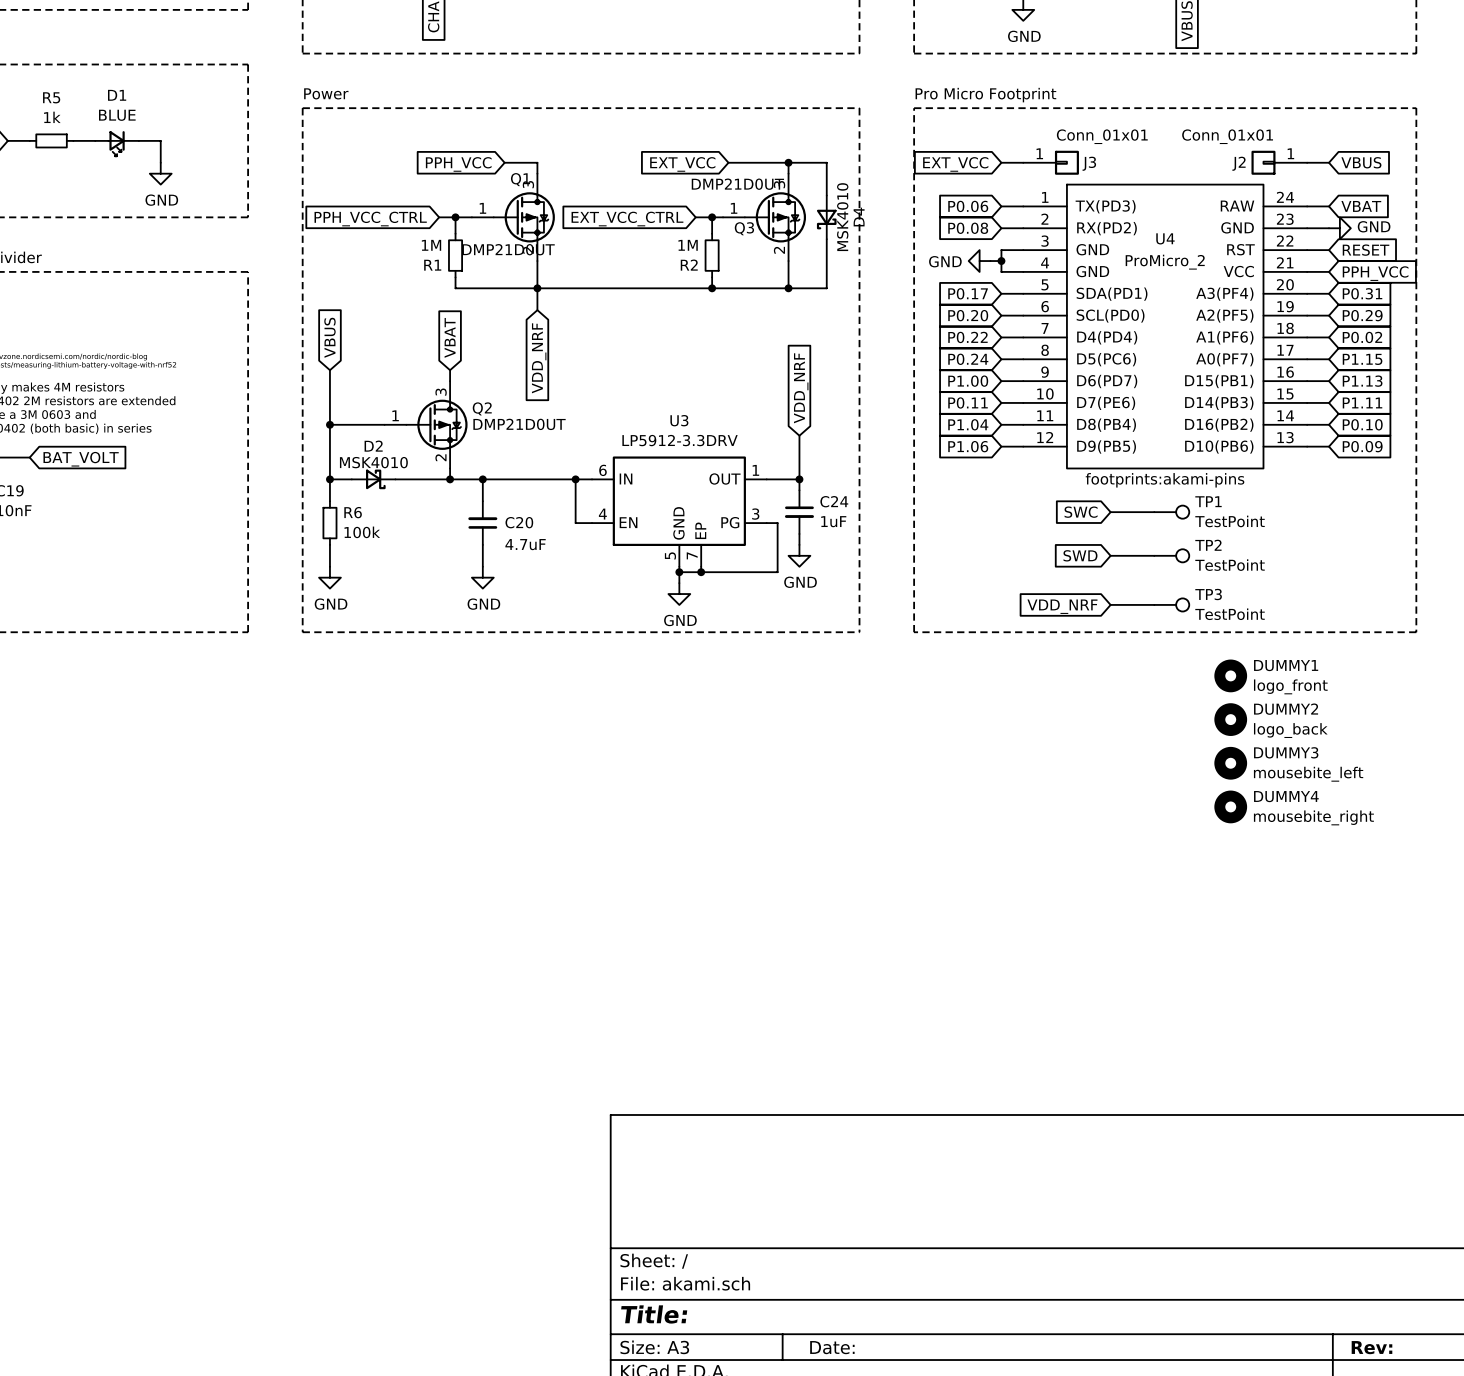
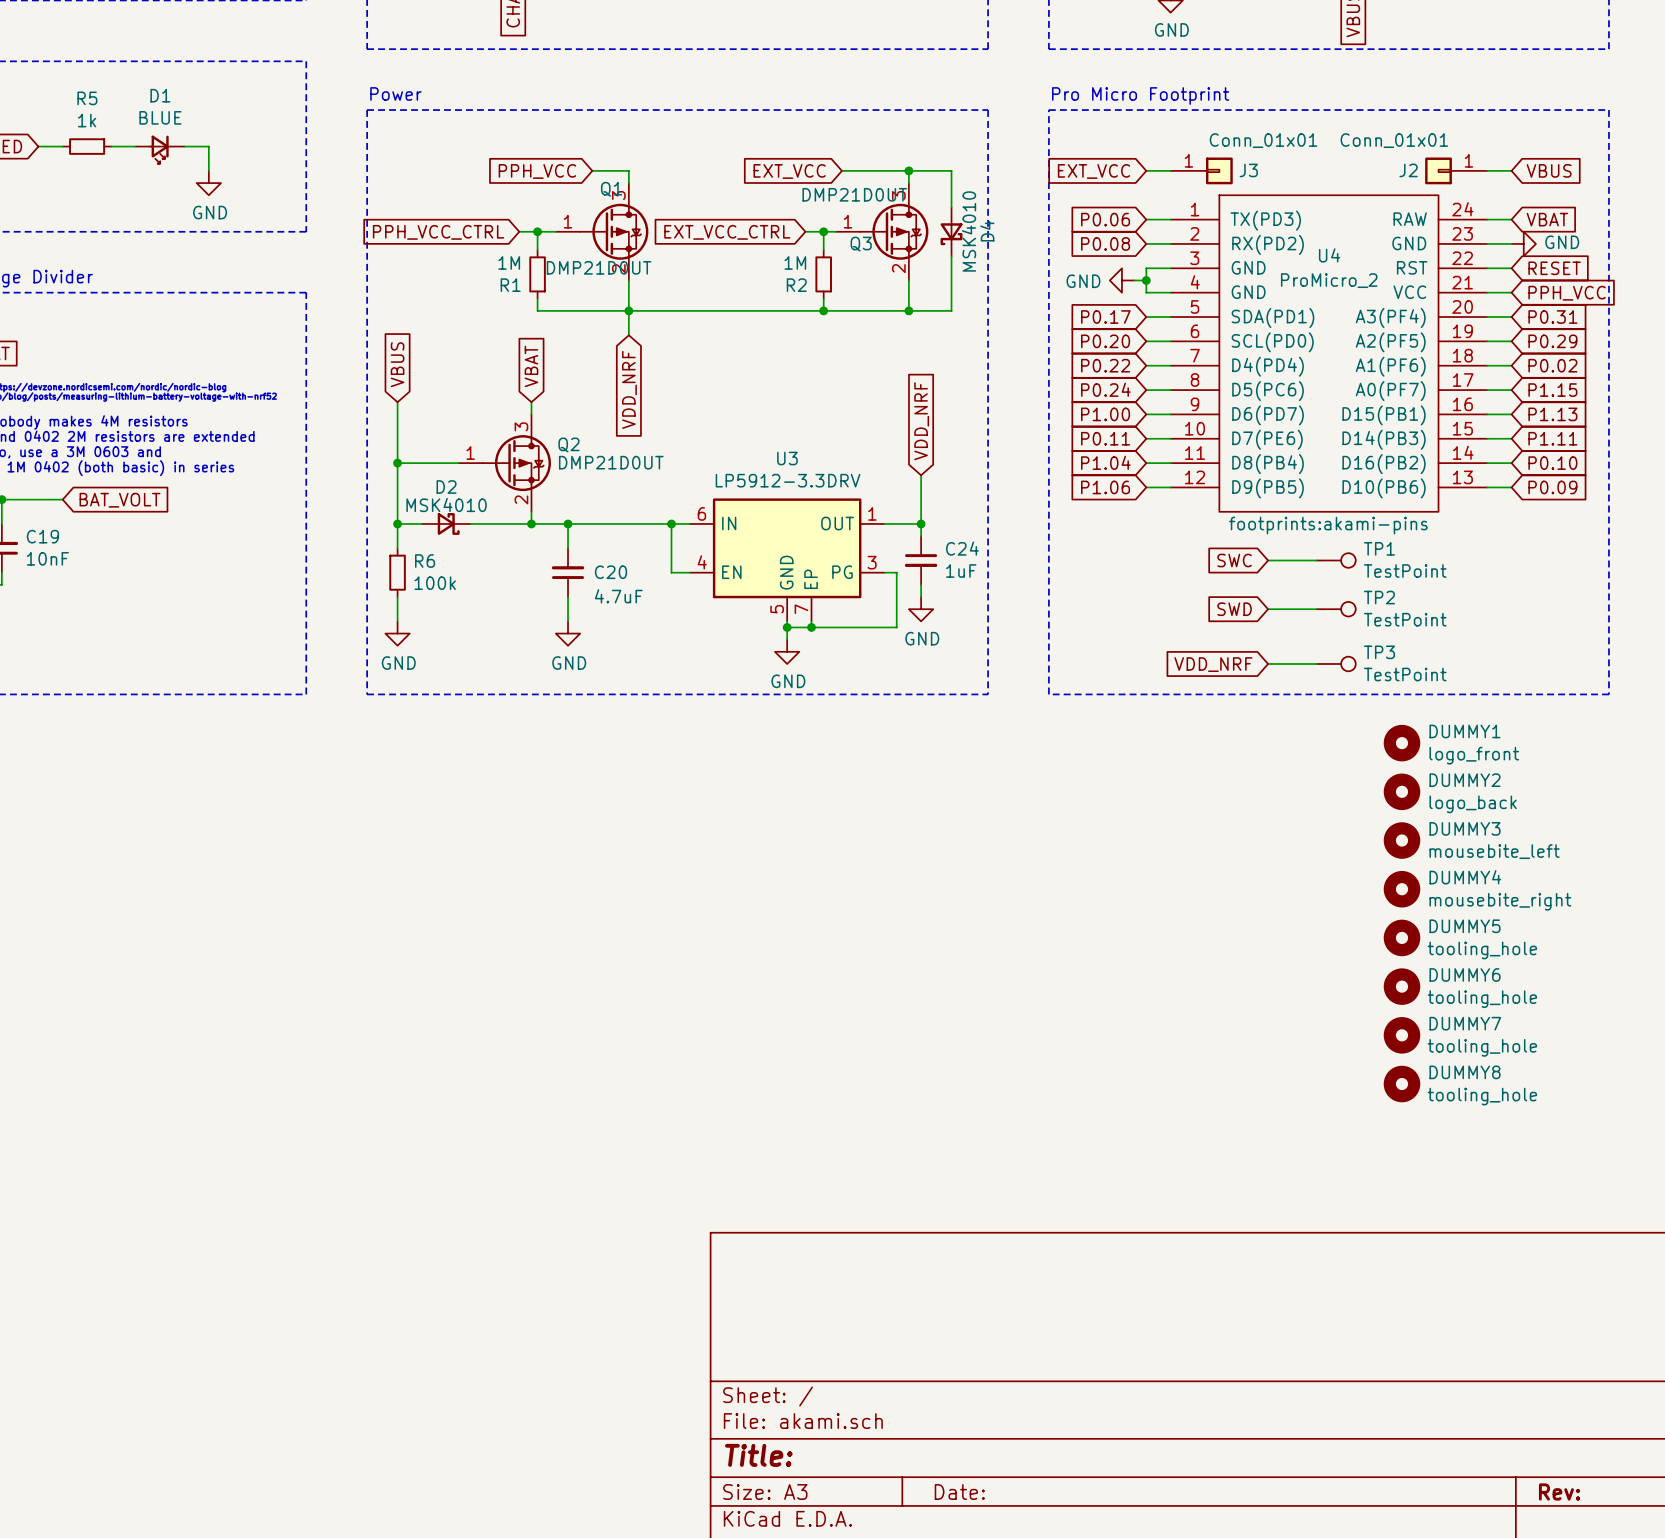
DUMMY5: none -> tooling_hole (1401, 937)
DUMMY6: none -> tooling_hole (1401, 986)
DUMMY7: none -> tooling_hole (1401, 1035)
DUMMY8: none -> tooling_hole (1401, 1084)

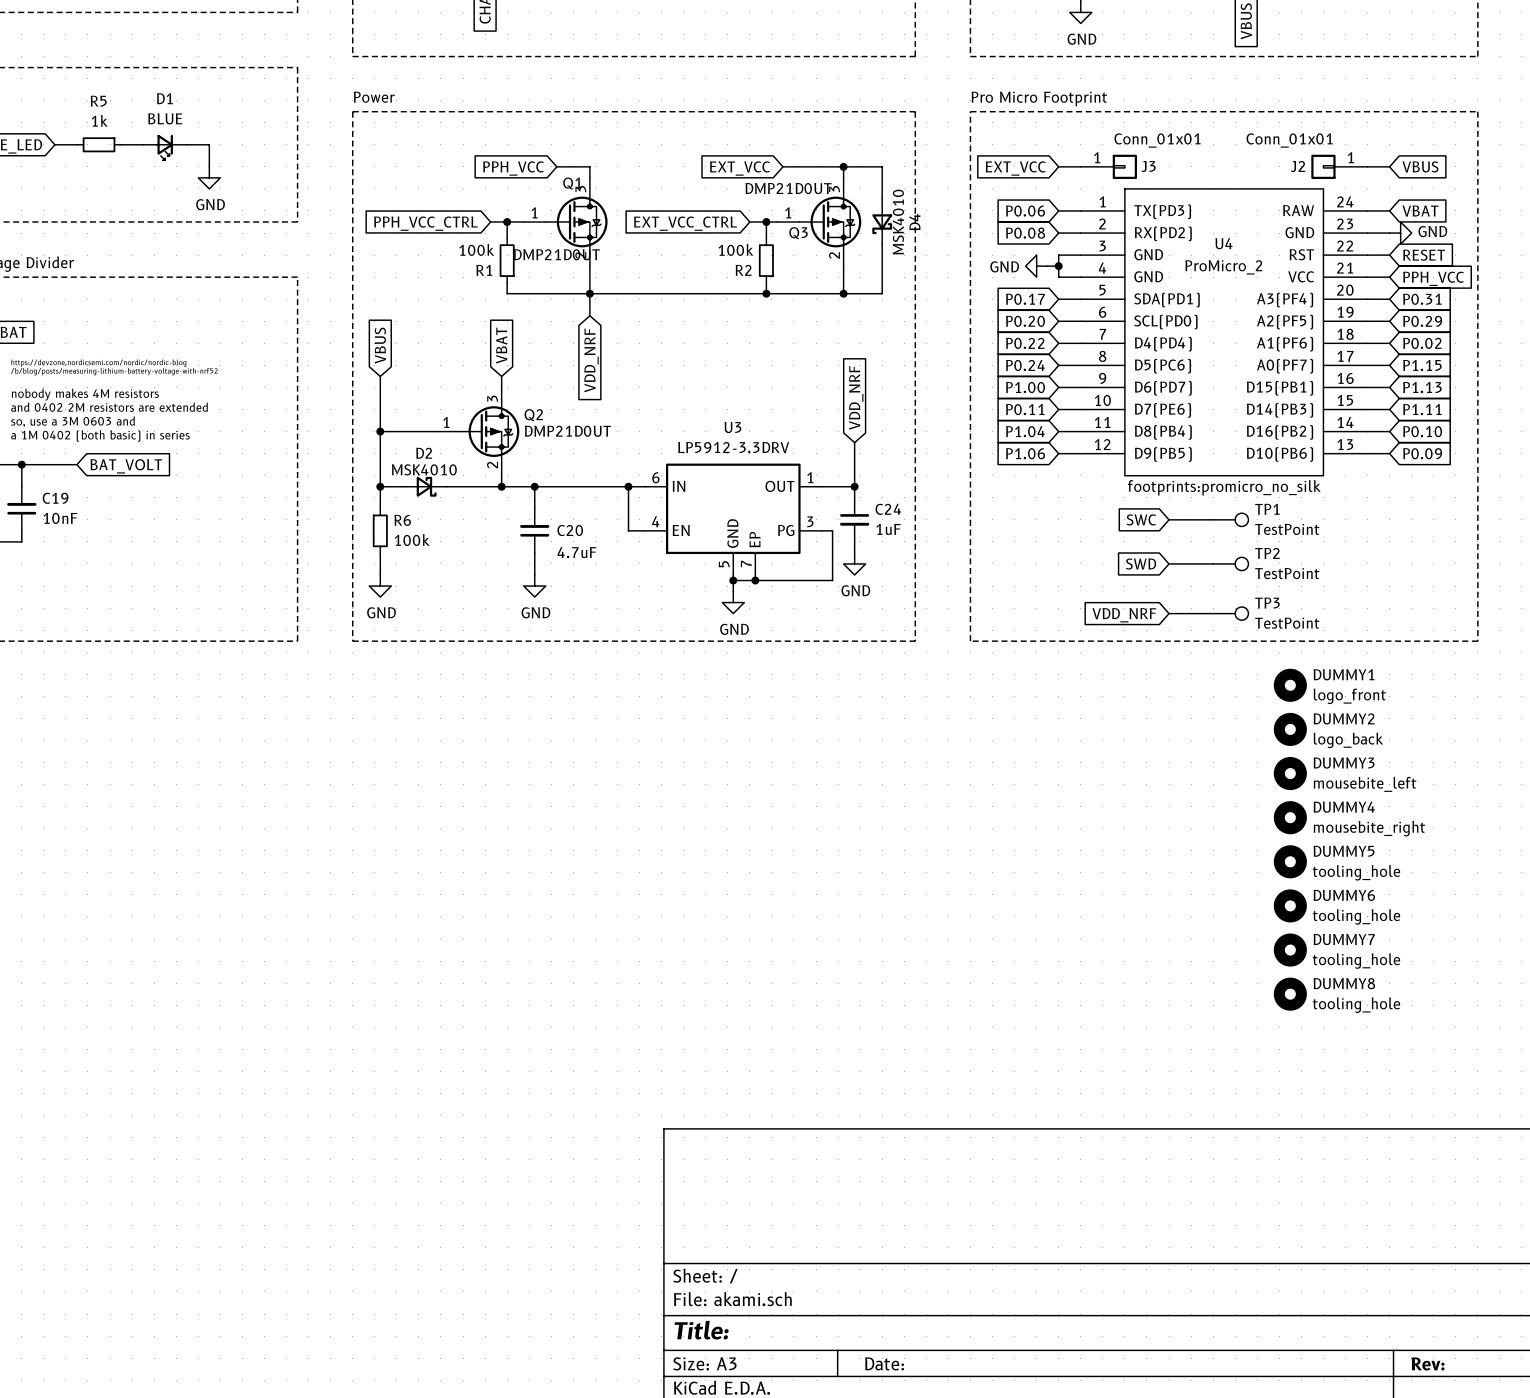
R1 value: 1M (509, 262) -> 100k (476, 249)
R2 value: 1M (795, 262) -> 100k (735, 249)
U4 text: footprints:akami-pins (1328, 525) -> footprints:promicro_no_silk (1224, 487)

